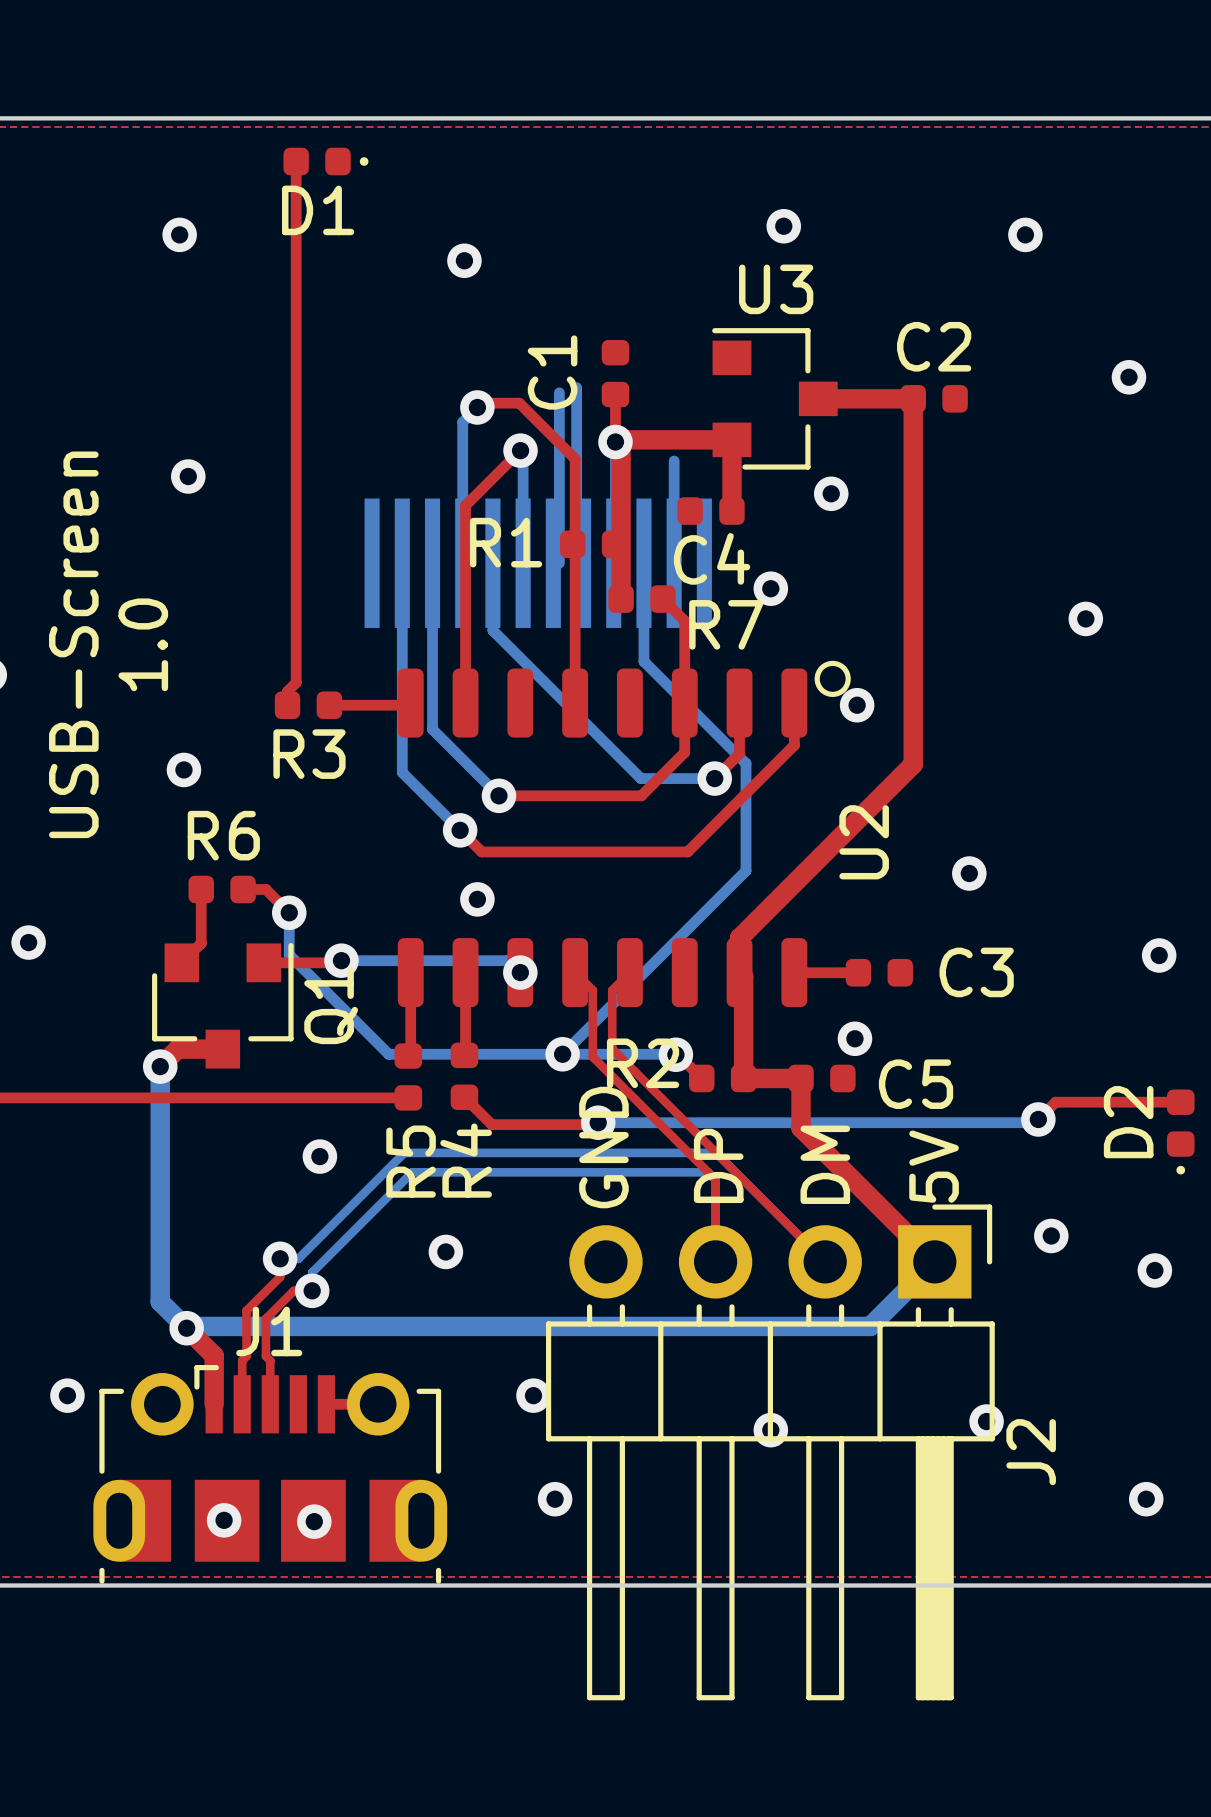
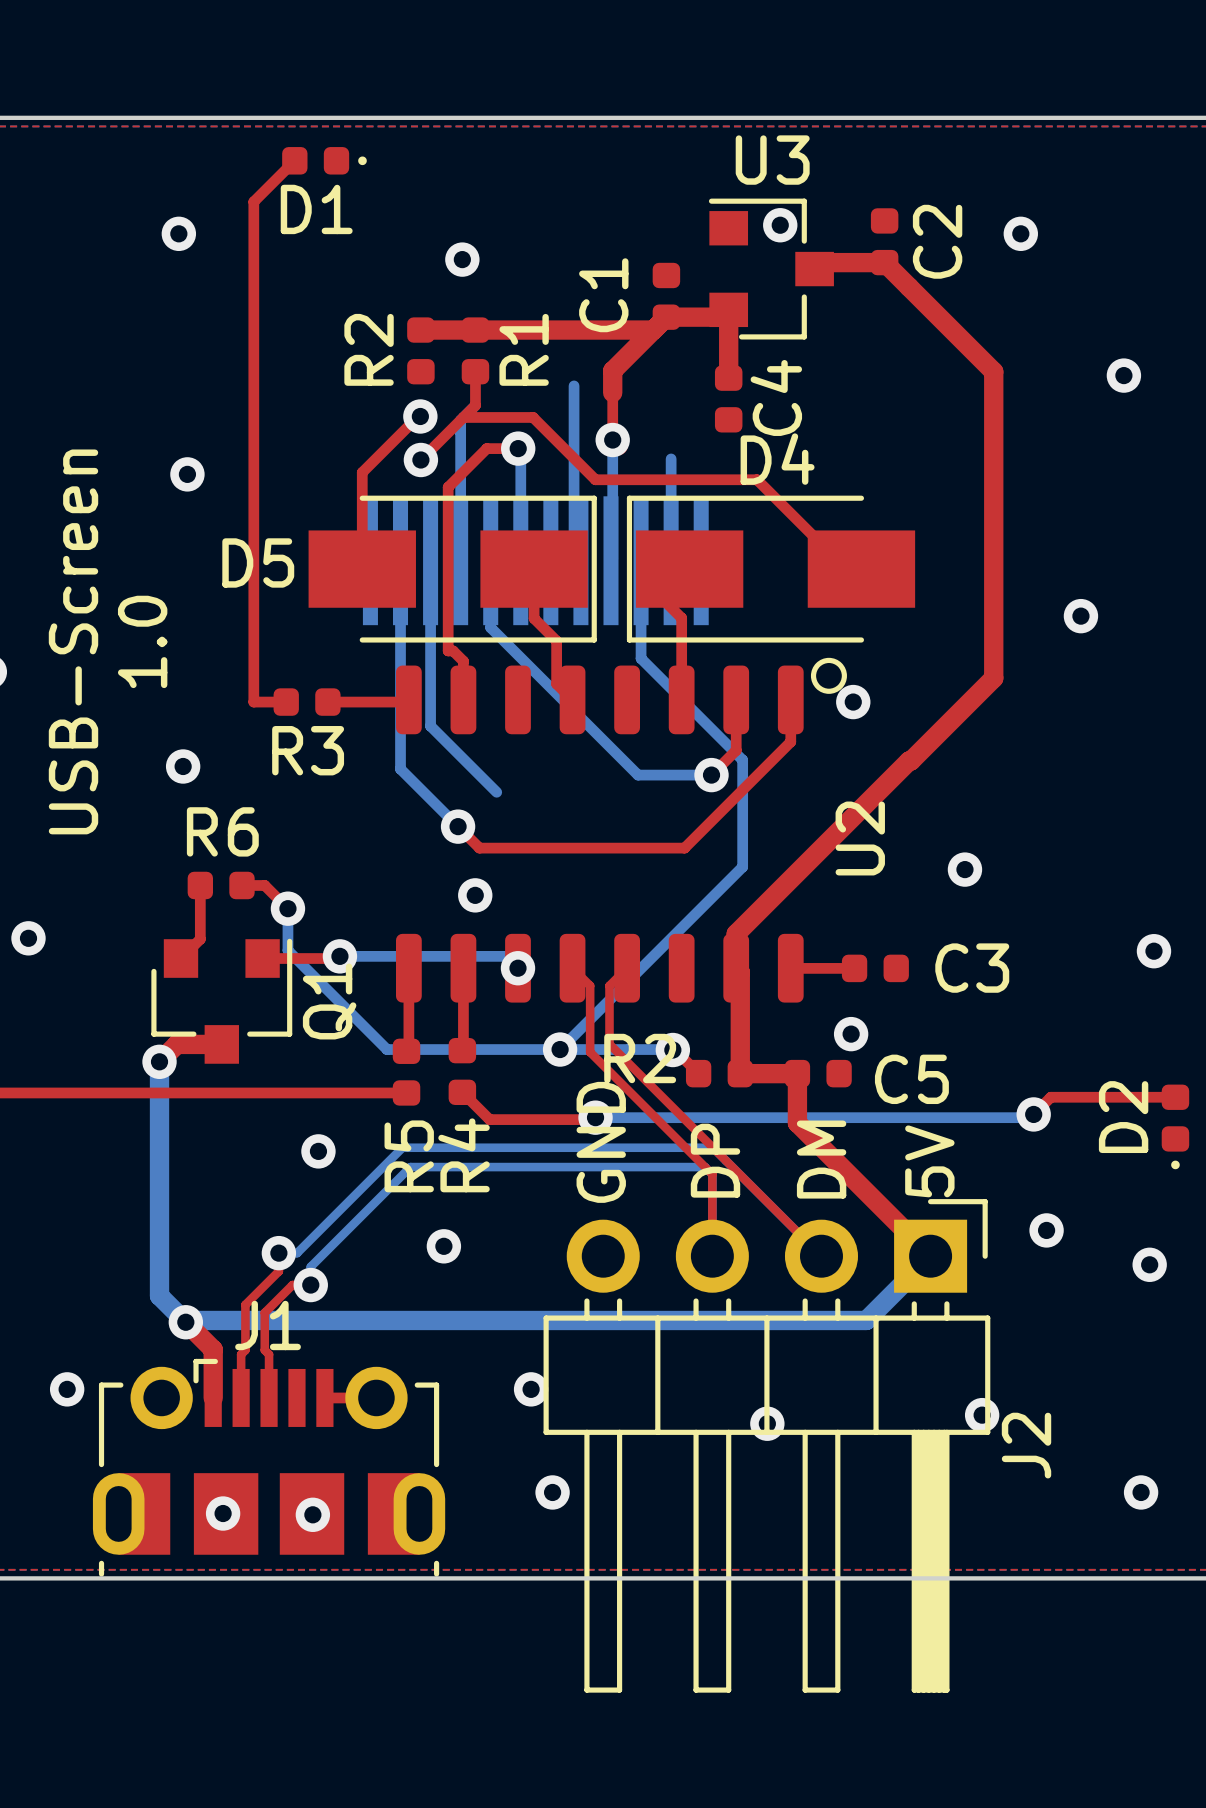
top track: (296, 161) (296, 682) (287, 691) (287, 705) -> (294, 160) (253, 201) (253, 702) (286, 702)
top track: none -> (420, 330) (653, 330)
R2: none -> (420, 350)
top track: none -> (475, 371) (475, 405)
C1 position: (615, 373) -> (666, 296)
top track: none -> (728, 378) (728, 309) (721, 317) (666, 317) (612, 370) (612, 392)
bottom track: (559, 392) (559, 563) -> none
U3 position: (774, 398) -> (771, 269)
top track: (818, 398) (913, 398) (913, 764) -> (814, 269) (821, 262) (884, 262) (993, 371) (993, 678) (909, 760)
C2 rotation: 0° (934, 398) -> 90° clockwise (884, 241)
C2 position: (934, 398) -> (884, 241)
top track: (477, 407) (481, 403) (519, 403) (535, 419) -> (463, 417) (533, 417)
top track: none -> (475, 405) (420, 459)
via: (477, 407) -> none
top track: none -> (420, 416) (362, 472) (362, 569)
via: none -> (420, 416)
top track: (617, 439) (731, 439) (731, 511) -> none
top track: (621, 447) (621, 599) -> none
top track: (520, 450) (465, 505) (465, 664) -> (518, 448) (486, 448) (448, 487) (448, 650) (453, 650) (463, 661)
top track: (575, 458) (575, 703) -> (534, 569) (534, 618) (556, 641) (556, 683) (572, 699)
top track: none -> (572, 456) (595, 479) (757, 479) (846, 569) (861, 569)
via: none -> (420, 459)
via: (831, 493) -> none
C4 rotation: 0° (711, 511) -> 90° clockwise (728, 398)
C4 position: (711, 511) -> (728, 398)
R1 name position: R1 (506, 542) -> R1 (524, 349)
R1 rotation: 0° (593, 544) -> 90° clockwise (475, 350)
R1 position: (593, 544) -> (475, 350)
D5: none -> (452, 569)
D4: none -> (771, 569)
via: (770, 588) -> none
R7: (642, 599) -> none
top track: (684, 703) (684, 752) (641, 795) (498, 795) -> none
via: (498, 795) -> none

